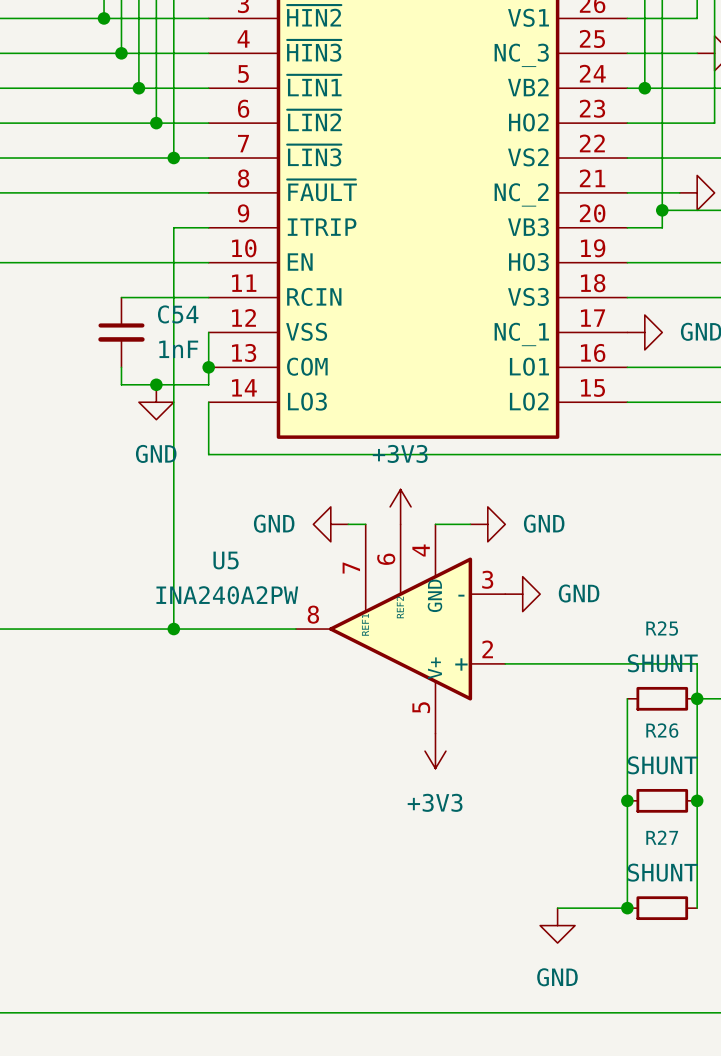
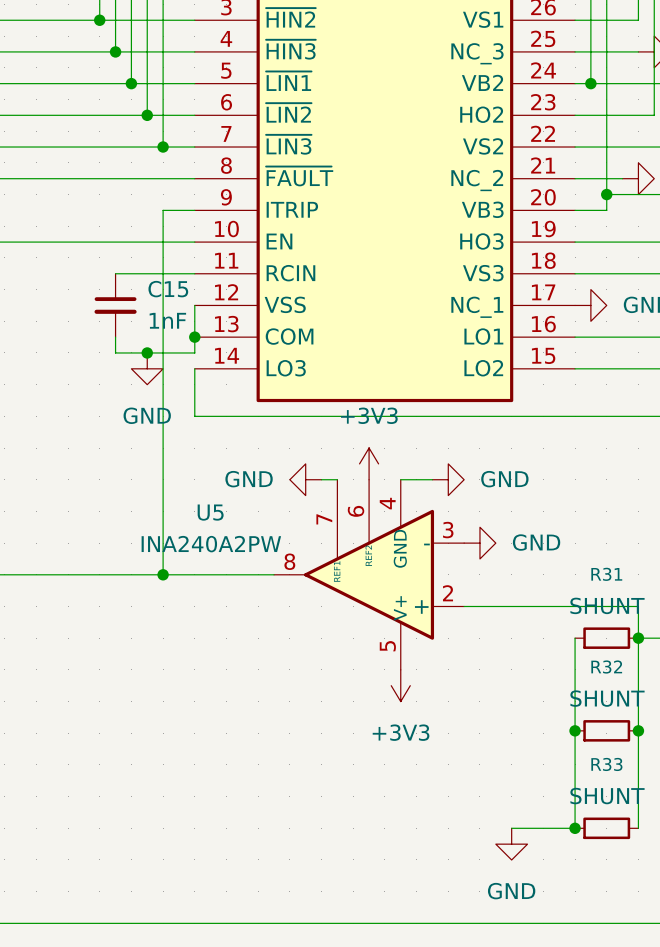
C54 name: C54 (178, 314) -> C15 (168, 289)
R25 name: R25 (662, 628) -> R31 (606, 574)
R26 name: R26 (662, 730) -> R32 (606, 667)
R27 name: R27 (662, 837) -> R33 (606, 764)

